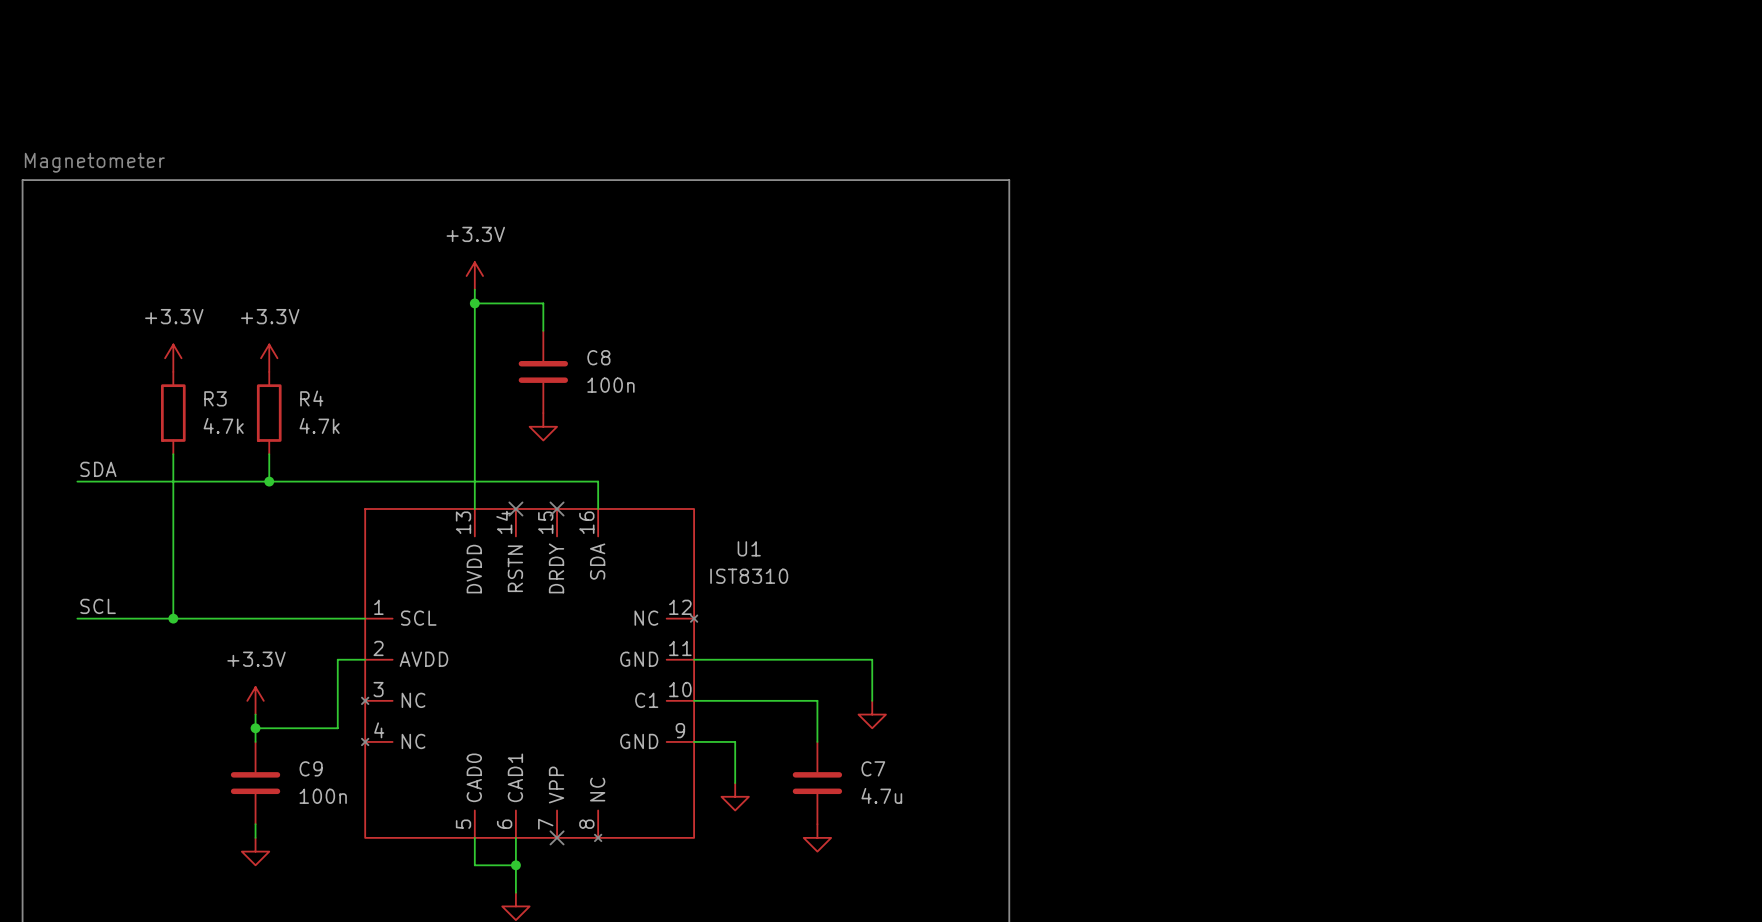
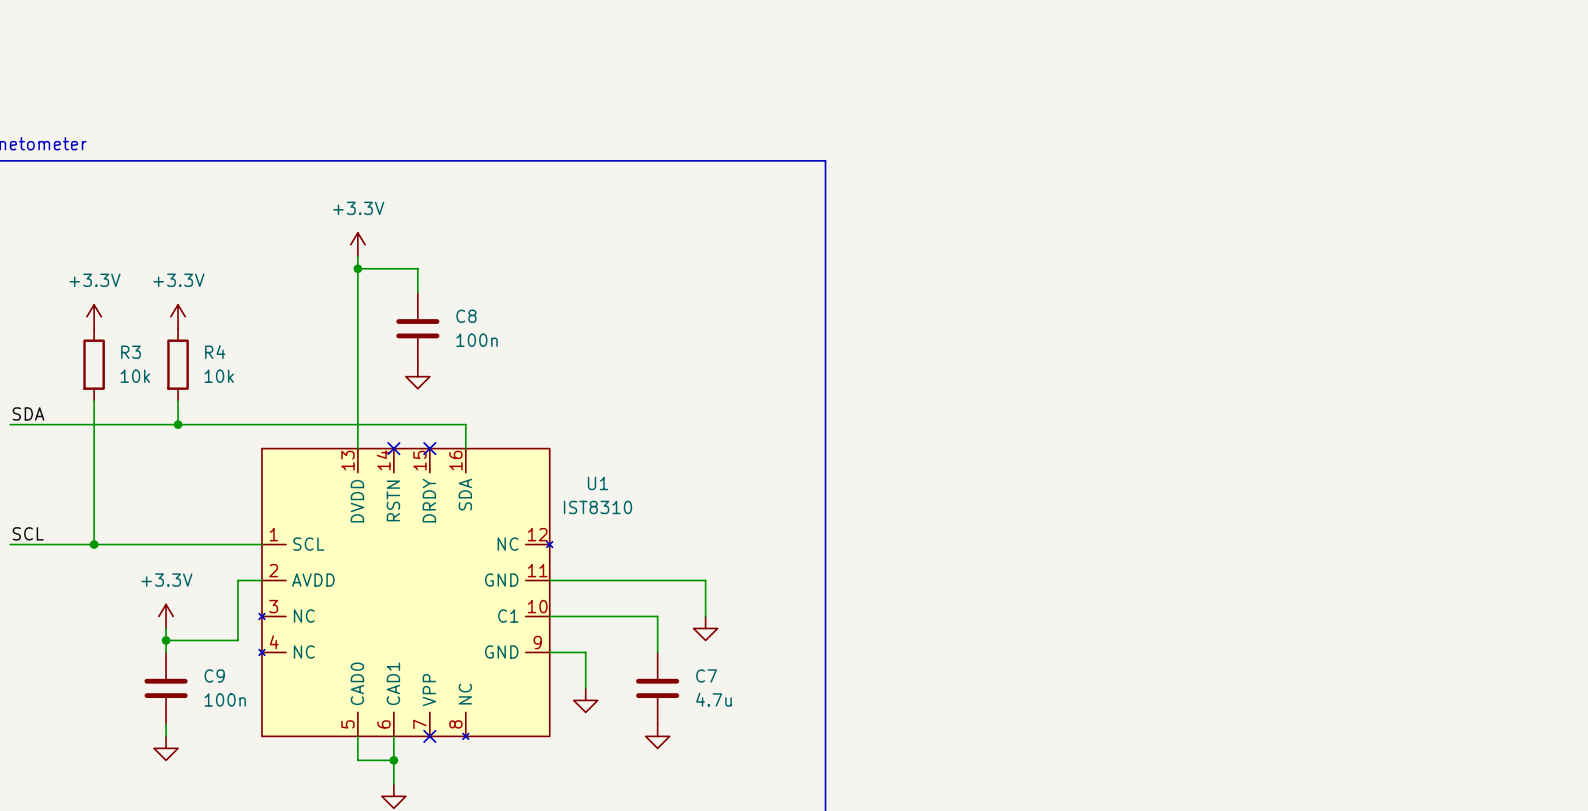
R3 value: 4.7k (223, 425) -> 10k (135, 376)
R4 value: 4.7k (319, 425) -> 10k (219, 376)

